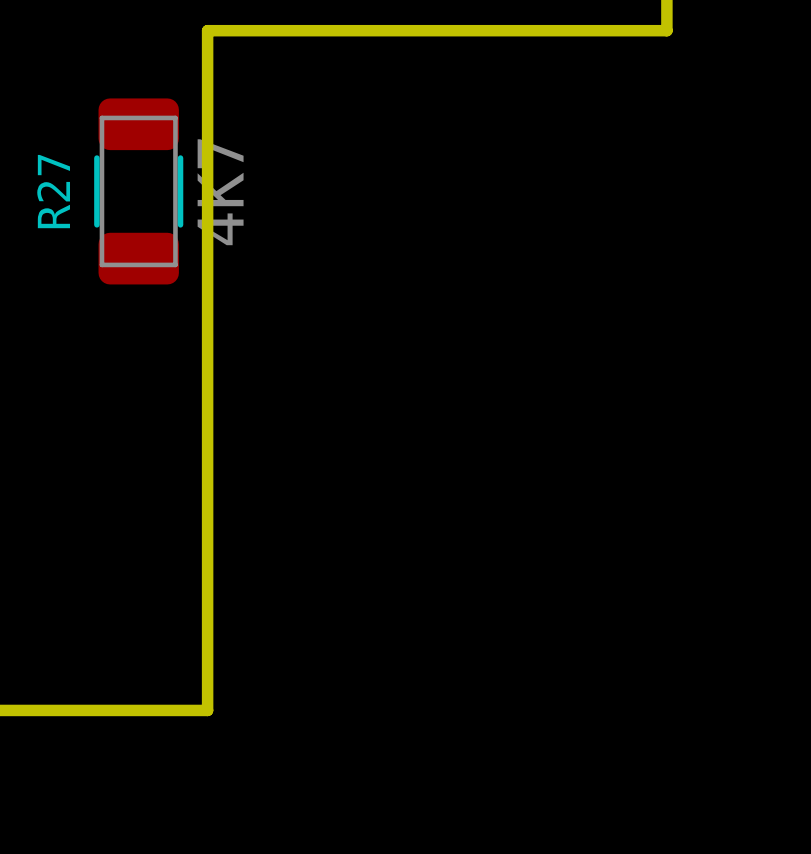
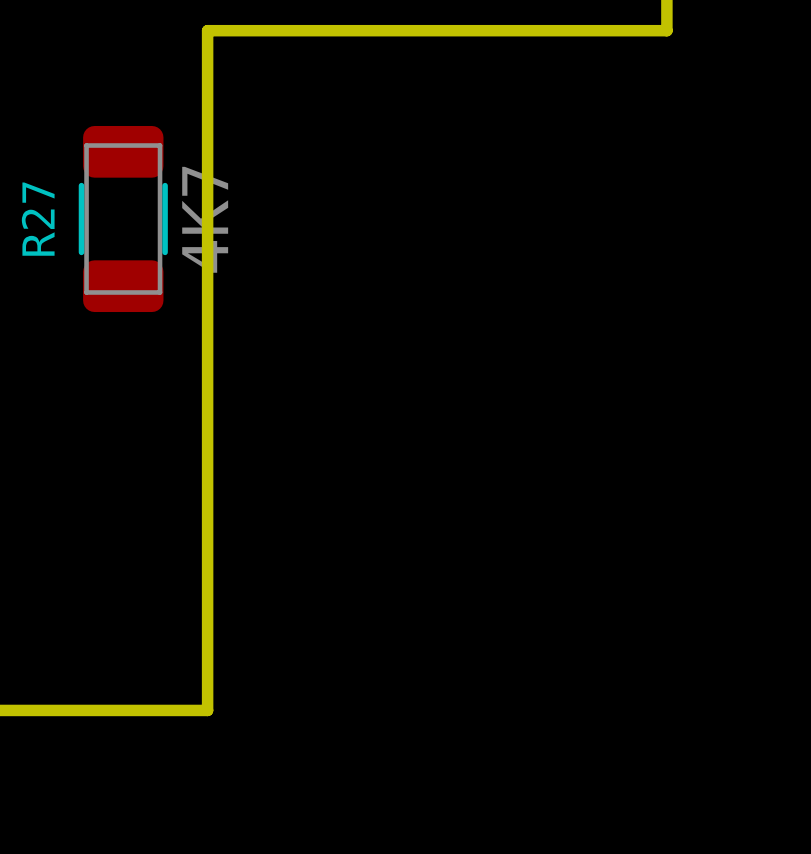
R27 position: (138, 191) -> (123, 219)

